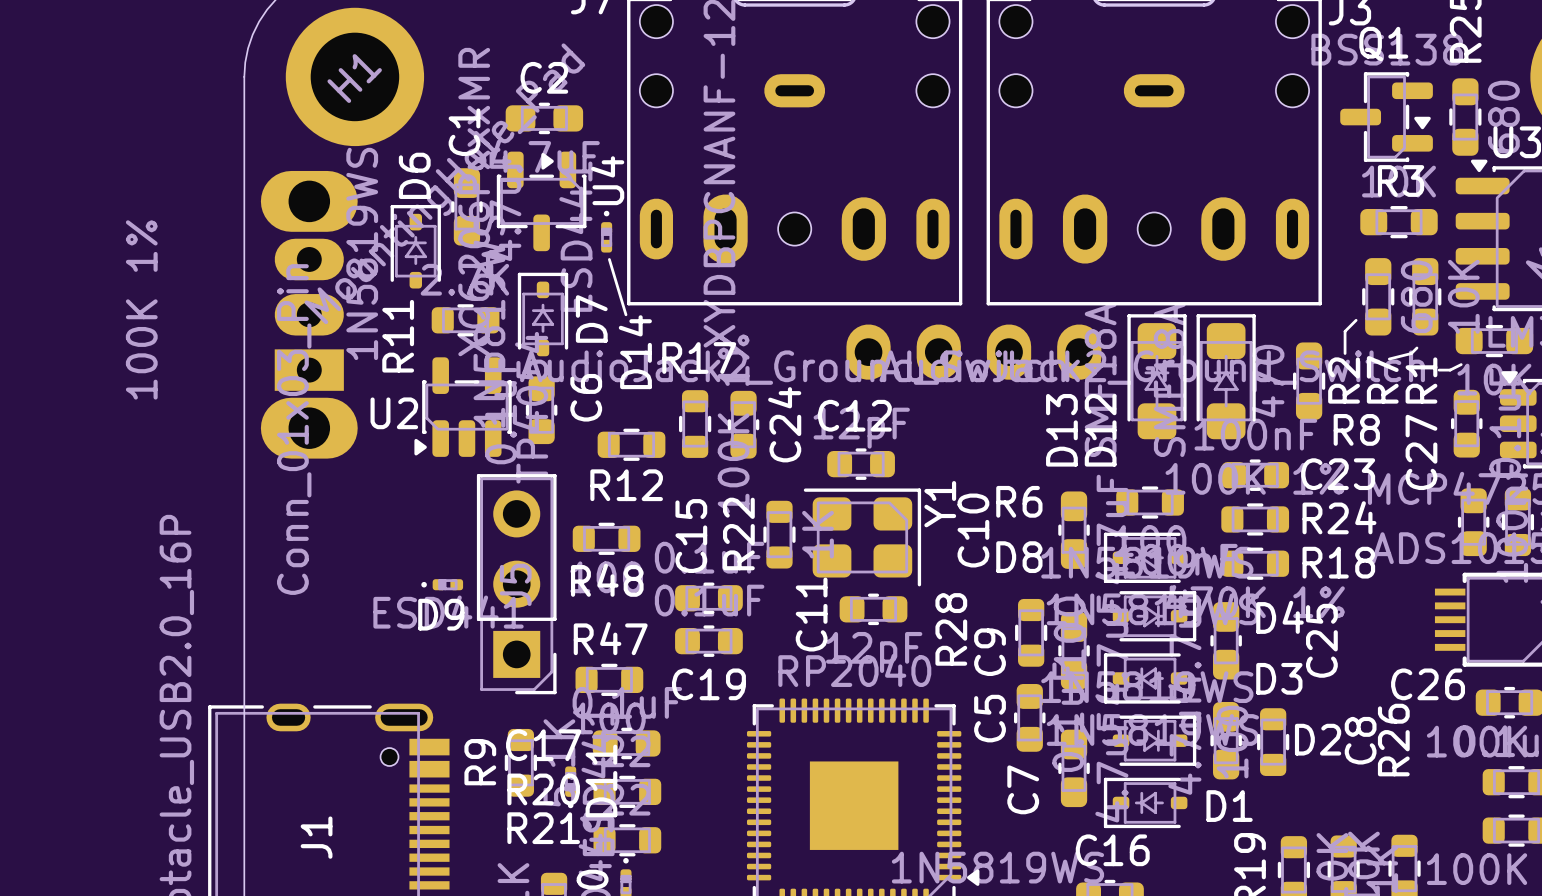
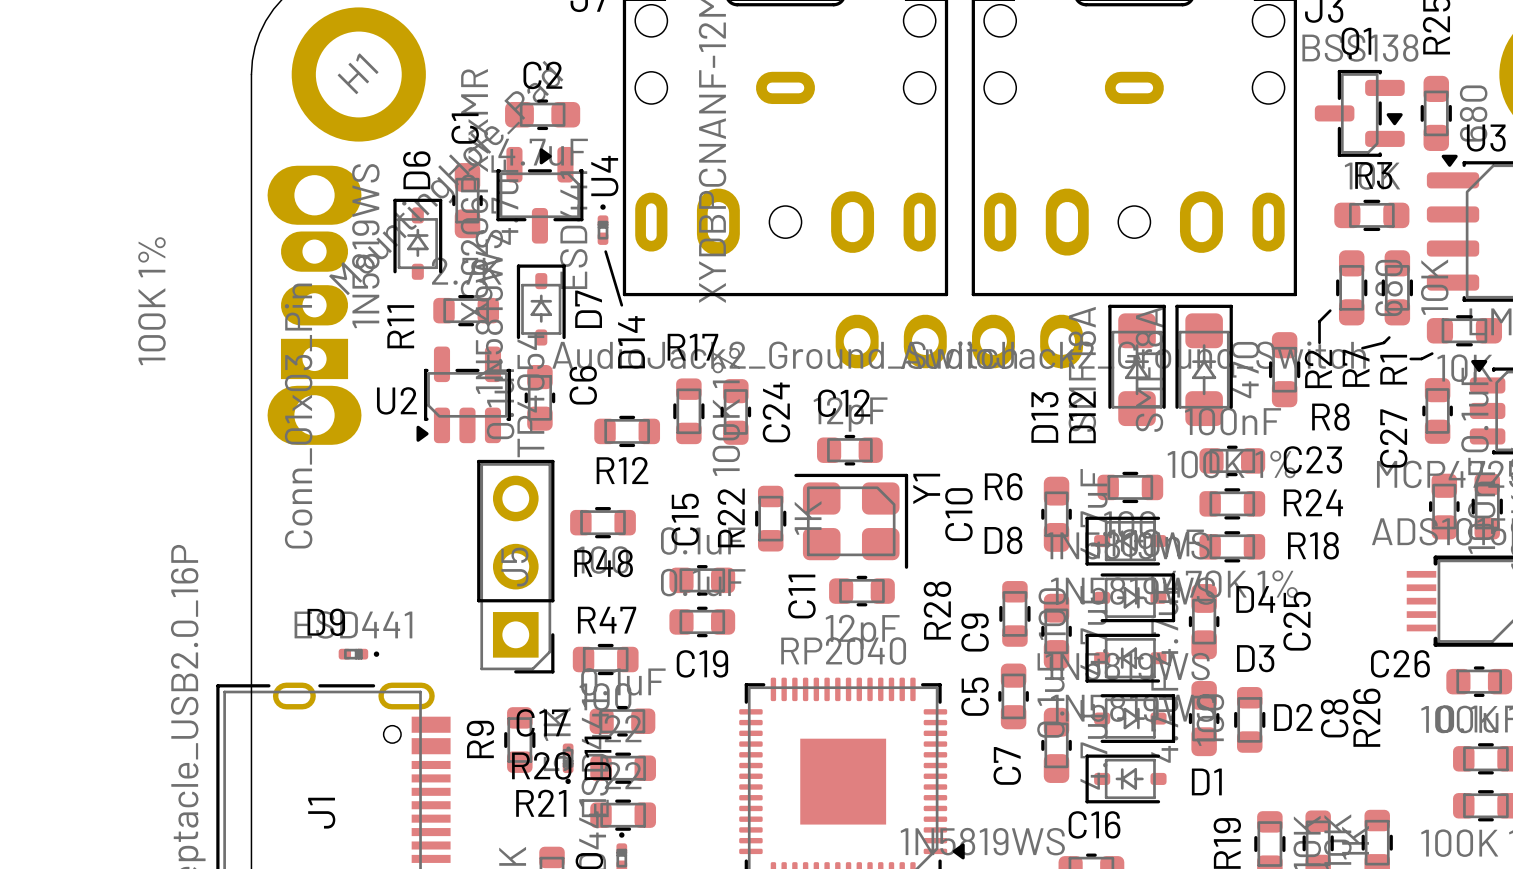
D9 rotation: 0° (442, 584) -> 180° (358, 654)
D9 position: (442, 584) -> (358, 654)

